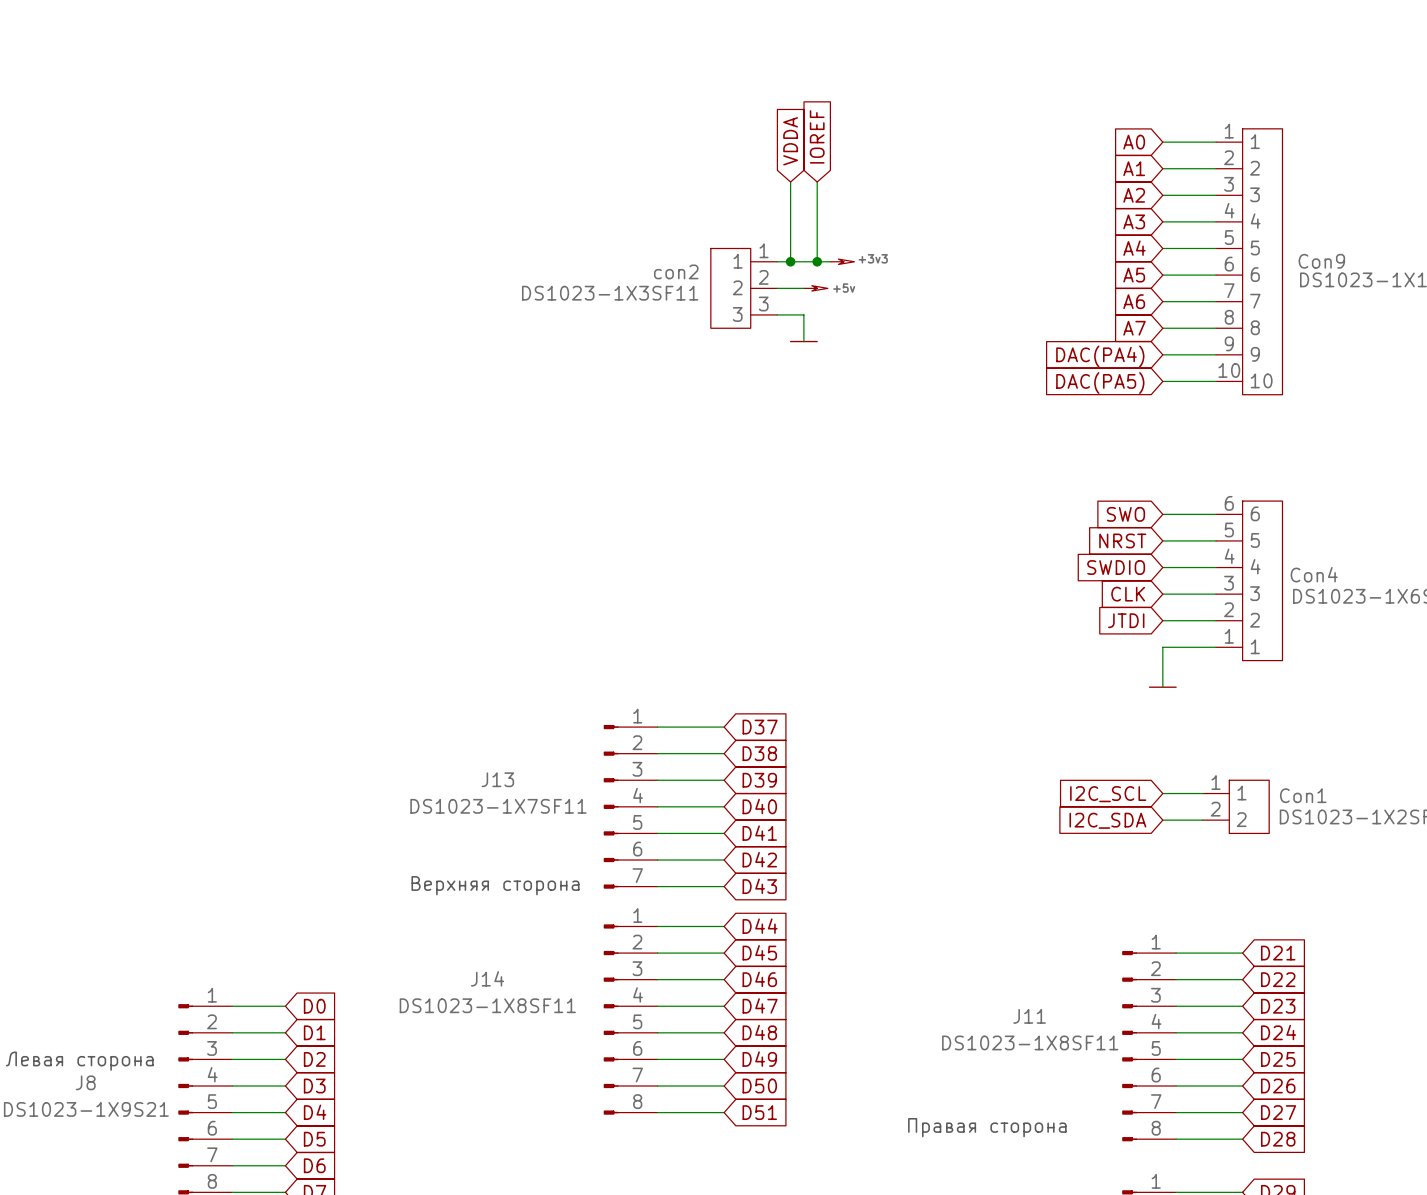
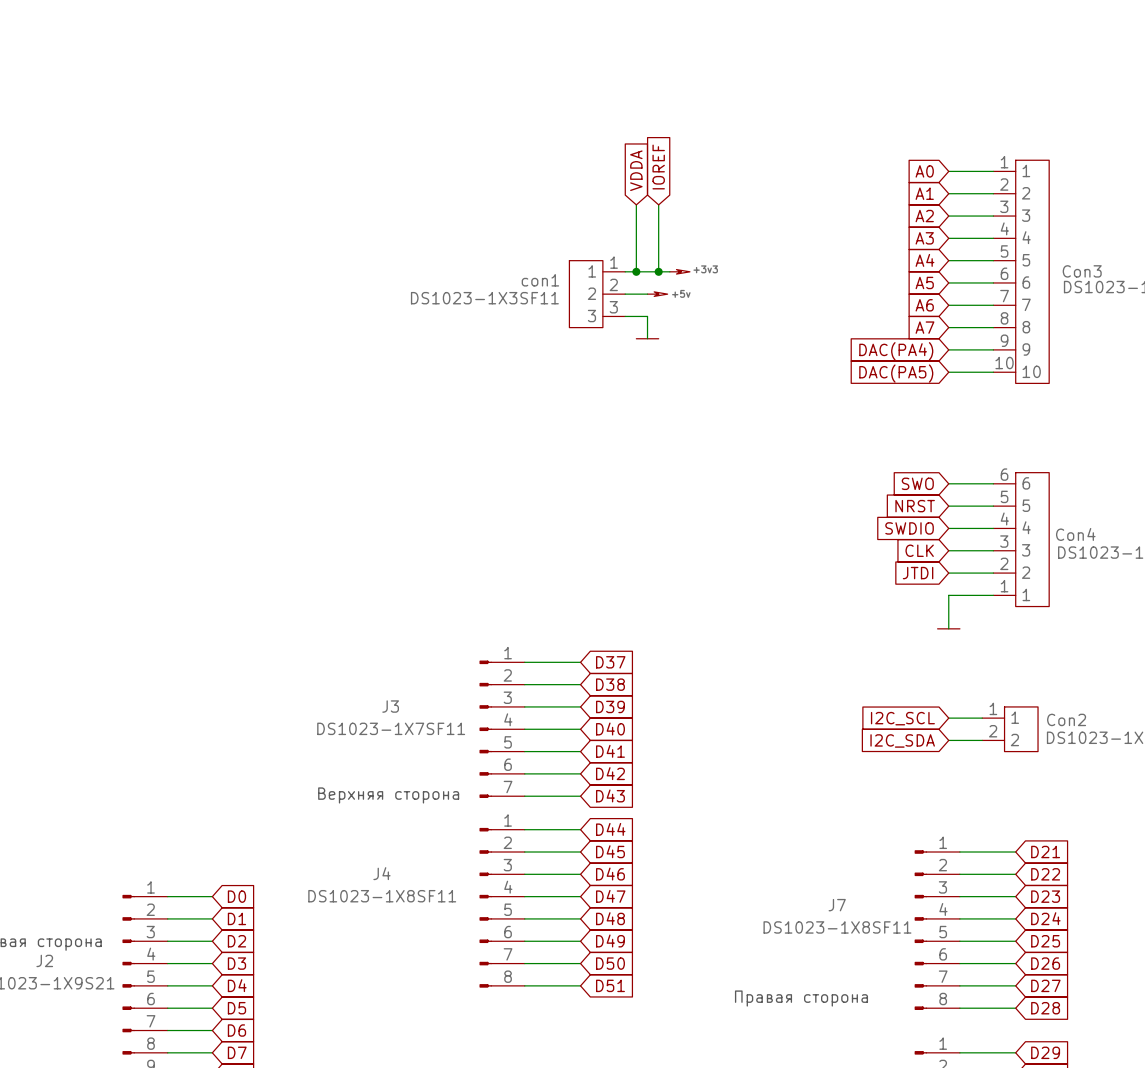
Con9 name: Con9 (1321, 261) -> Con3 (1082, 271)
con2 name: con2 (676, 271) -> con1 (540, 280)
J13 name: J13 (497, 779) -> J3 (390, 706)
Con1 name: Con1 (1303, 795) -> Con2 (1066, 719)
J14 name: J14 (487, 978) -> J4 (381, 873)
J11 name: J11 (1029, 1016) -> J7 (837, 905)
J8 name: J8 (85, 1082) -> J2 (44, 960)

